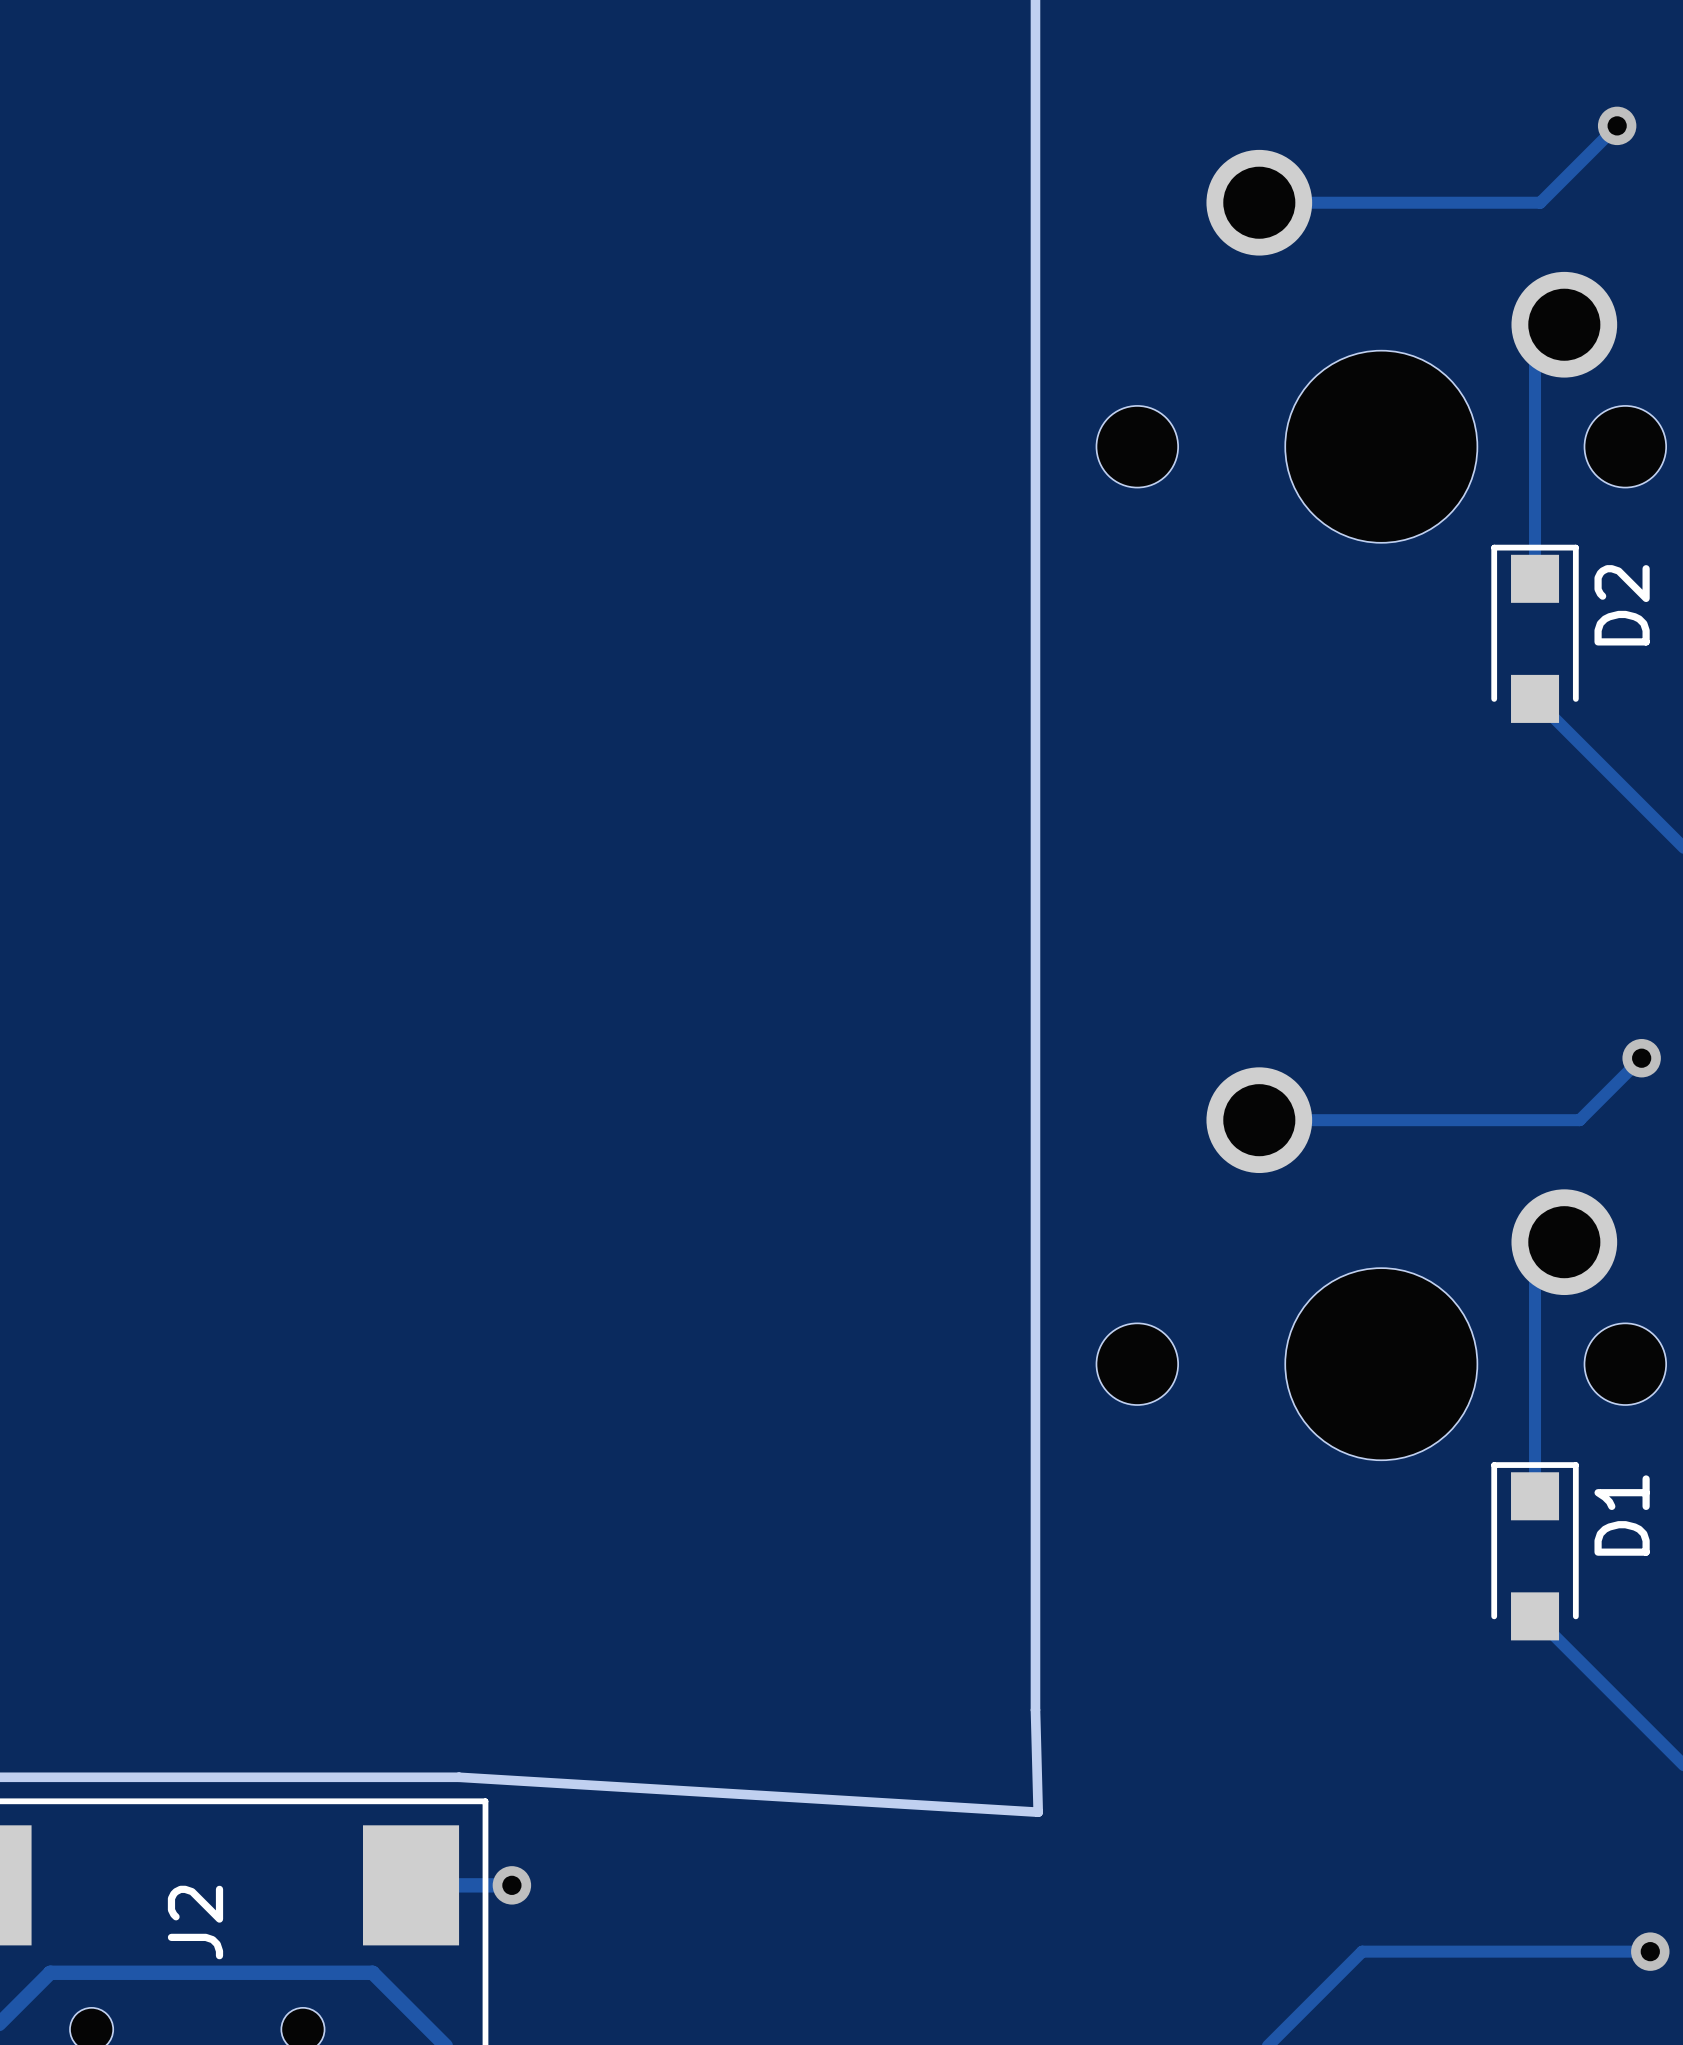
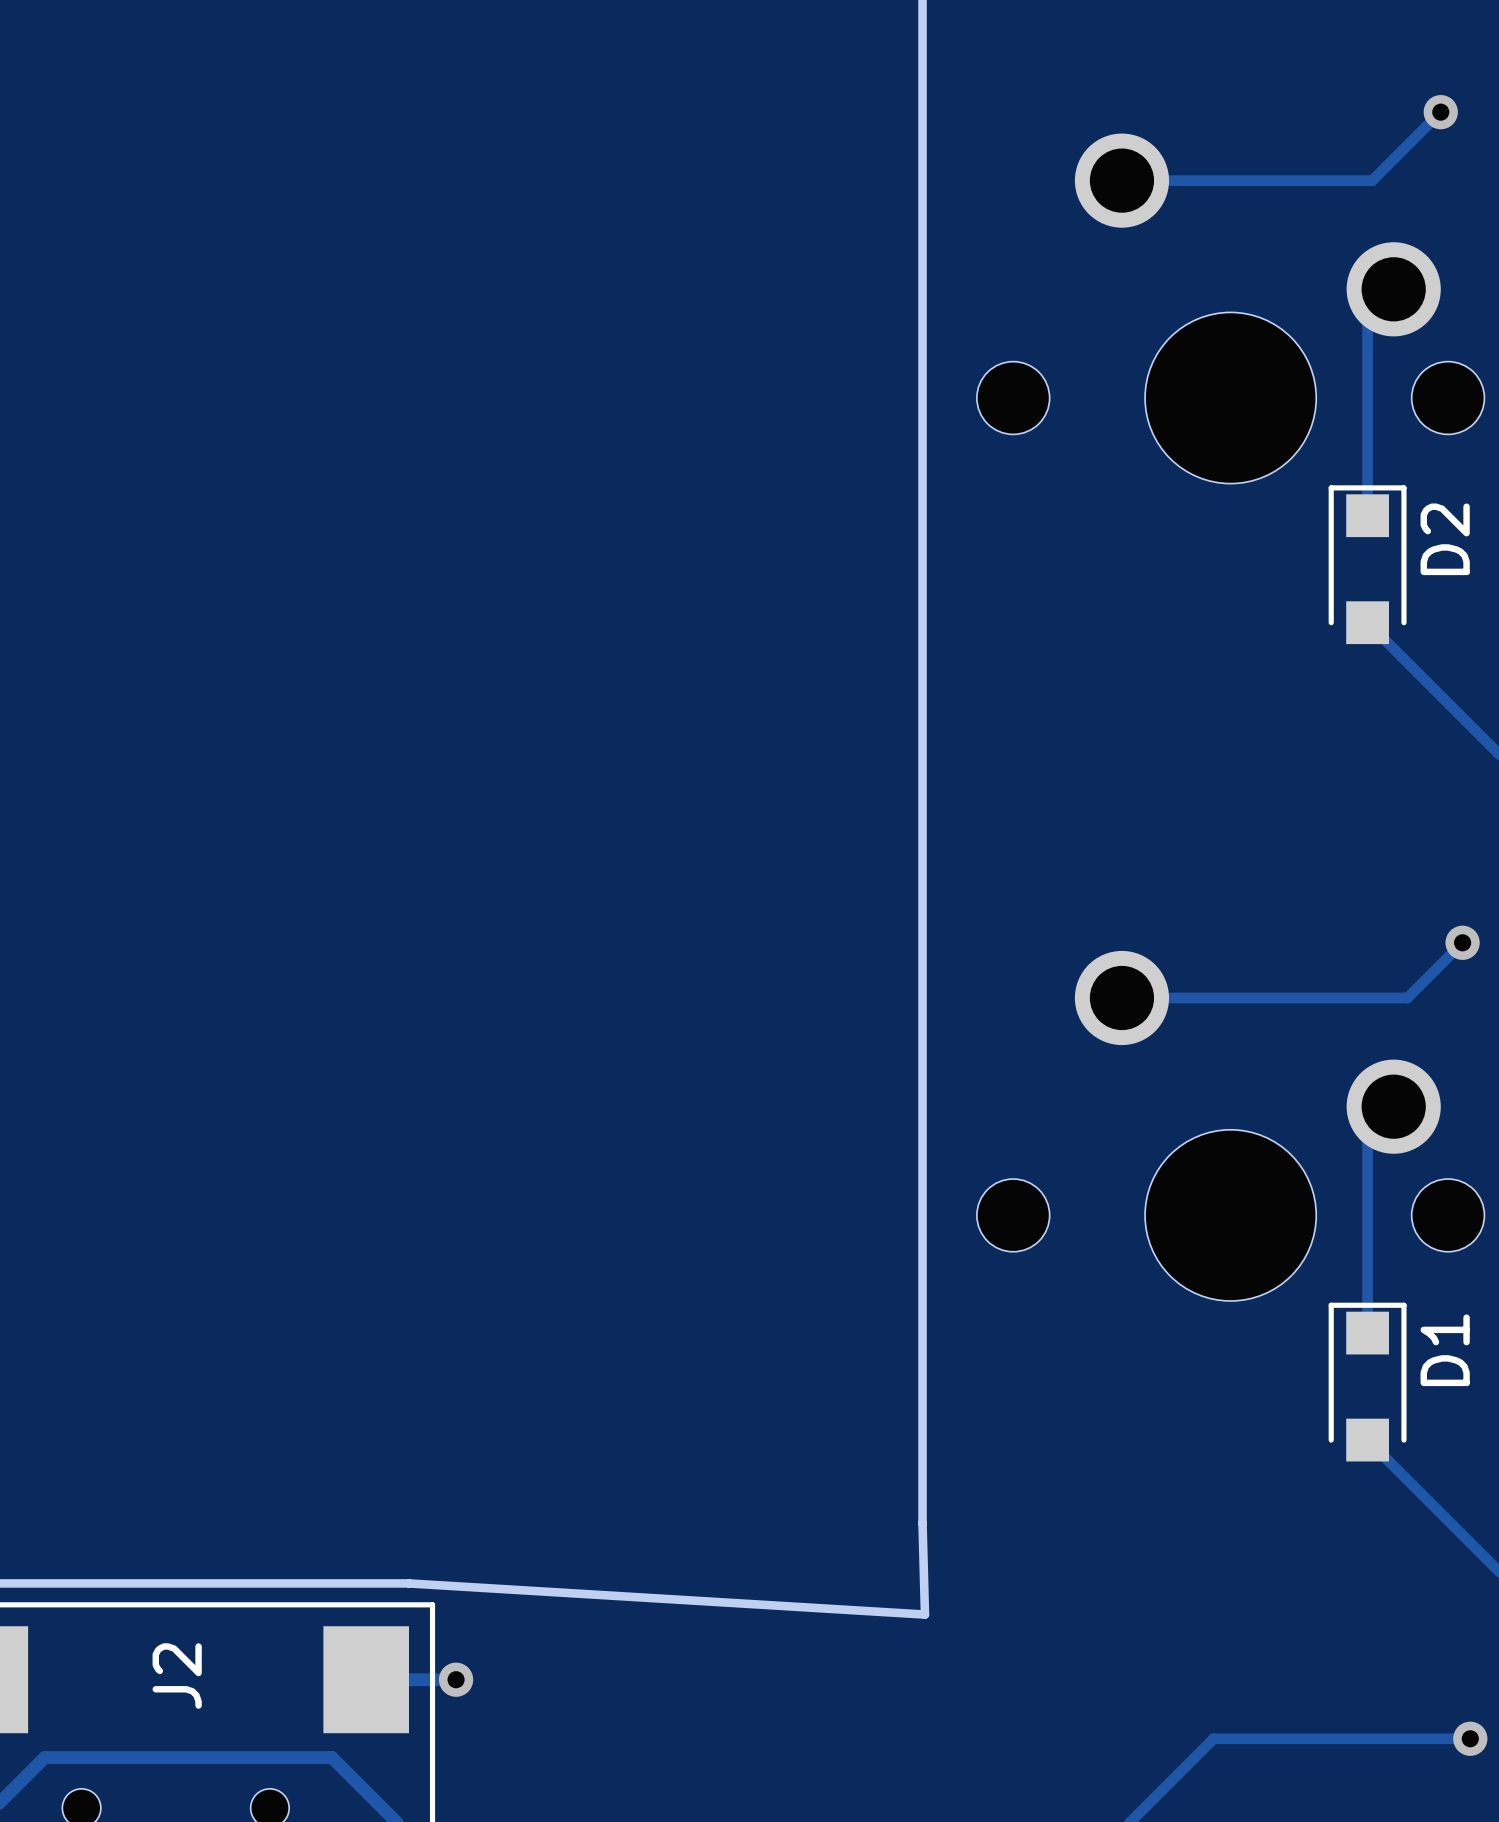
J2 name position: J2 (195, 1922) -> J2 (177, 1676)

